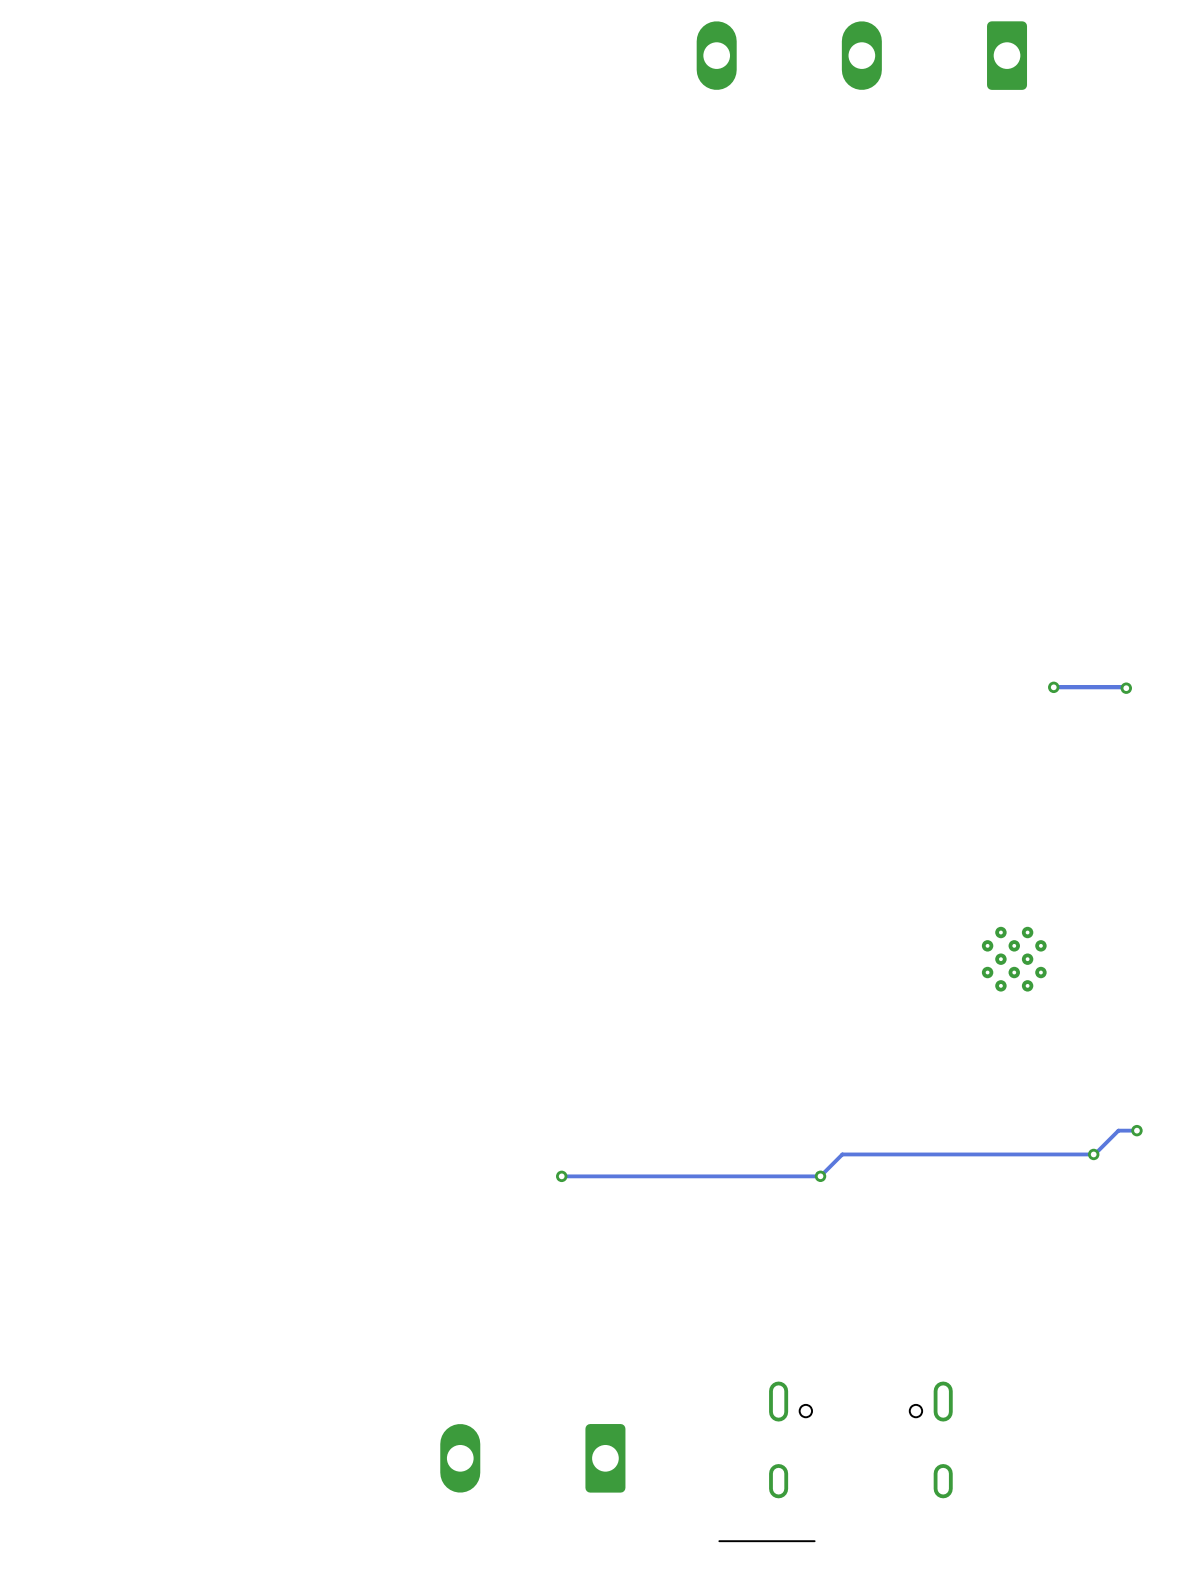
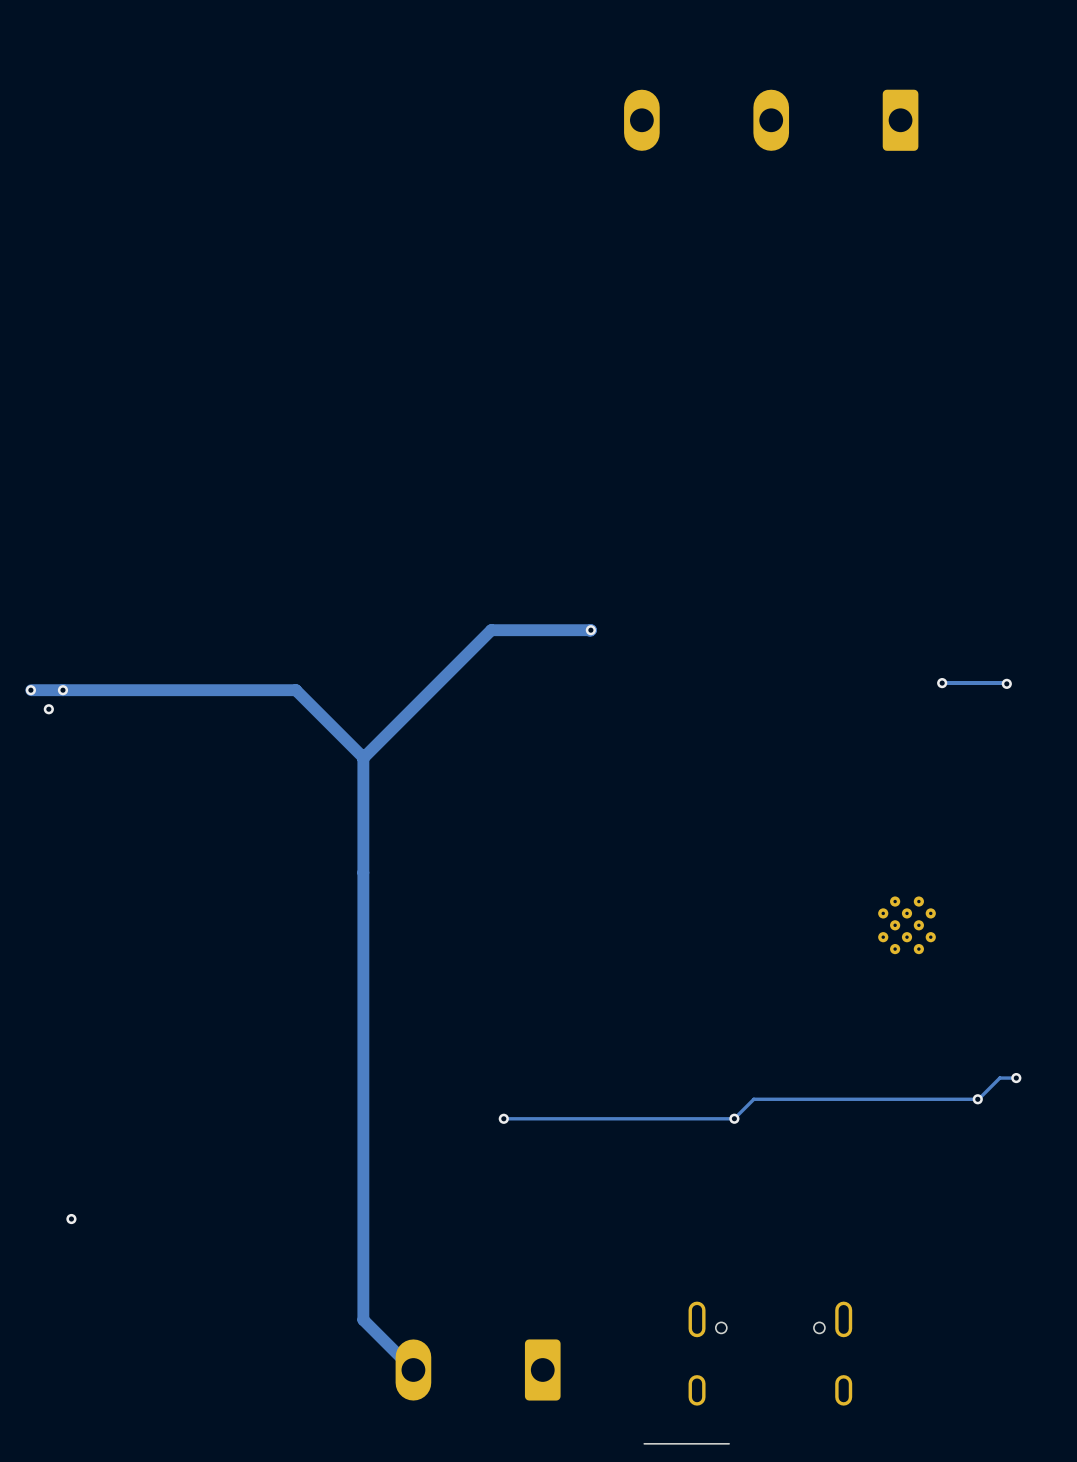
via: none -> (590, 630)
track: none -> (590, 630) (491, 630) (363, 758)
via: none -> (30, 690)
track: none -> (31, 690) (295, 690) (363, 757) (363, 1319) (413, 1369)
via: none -> (62, 690)
via: none -> (48, 709)
via: none -> (71, 1219)

